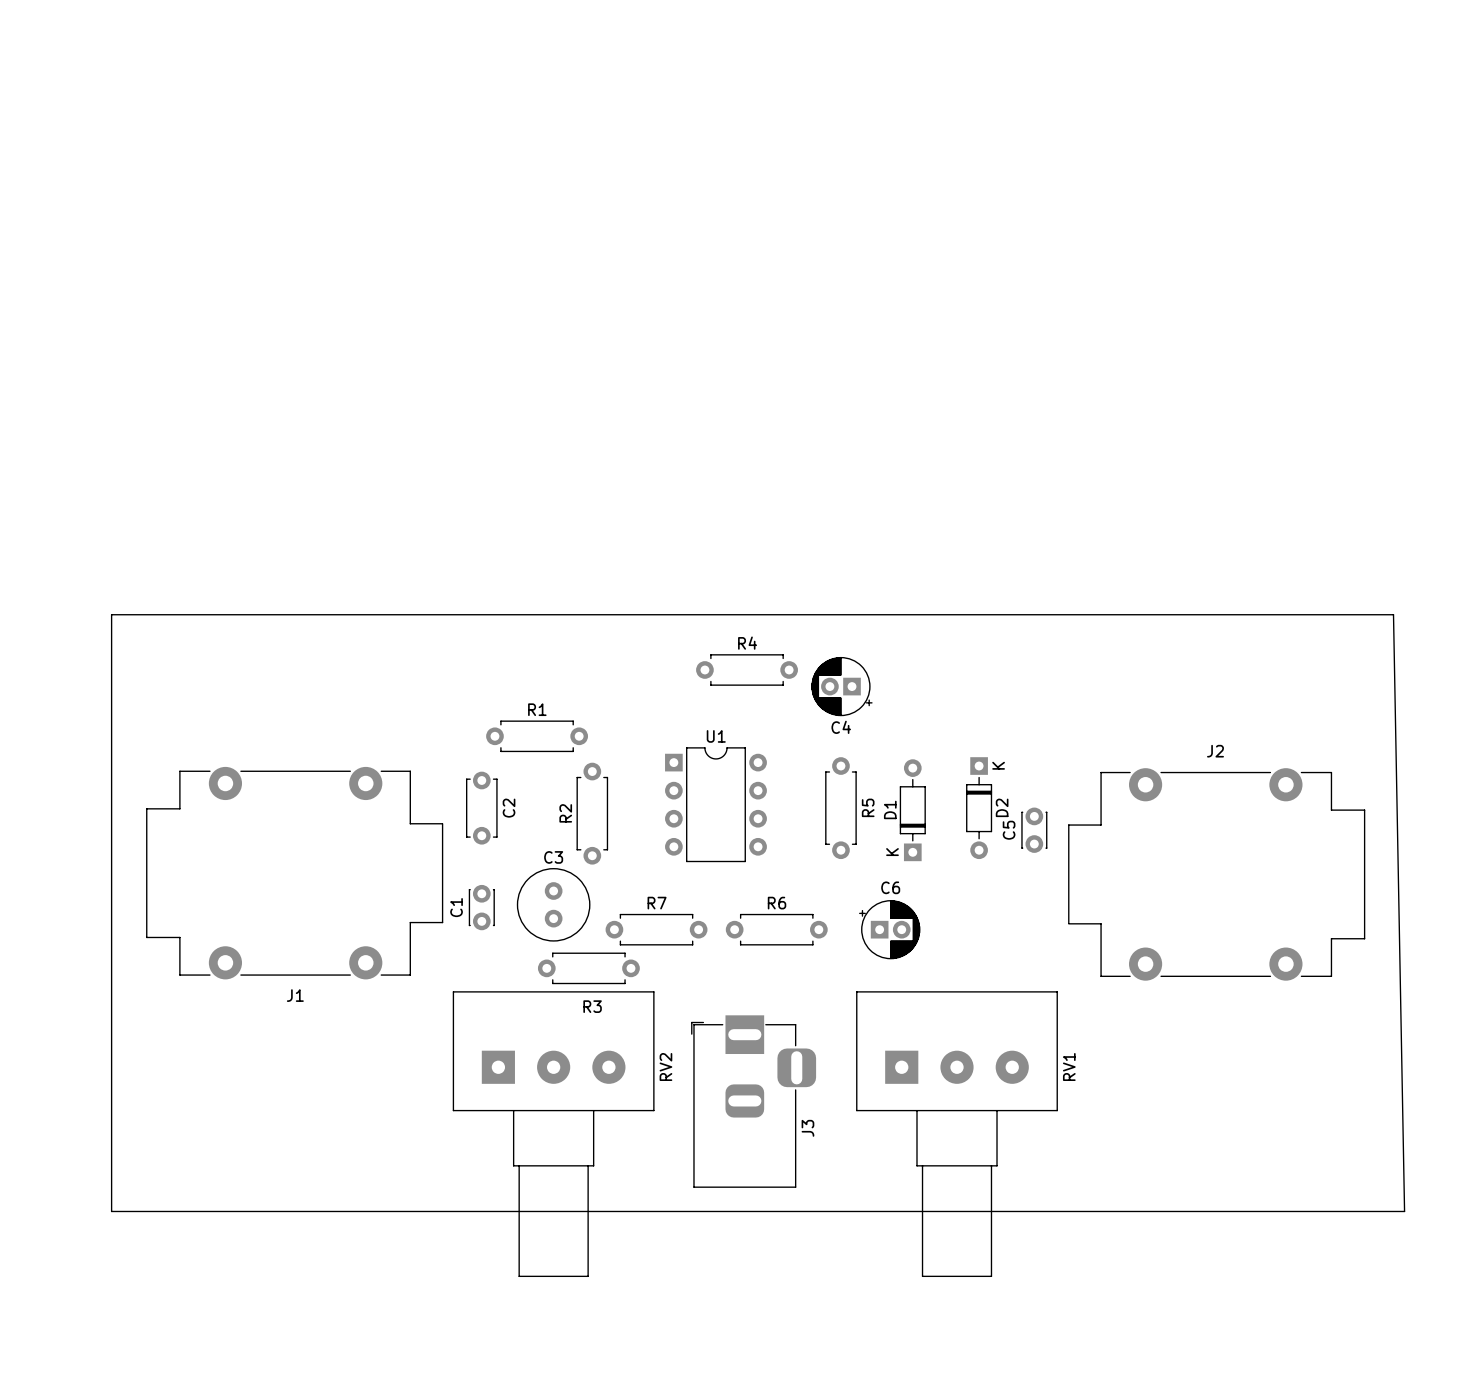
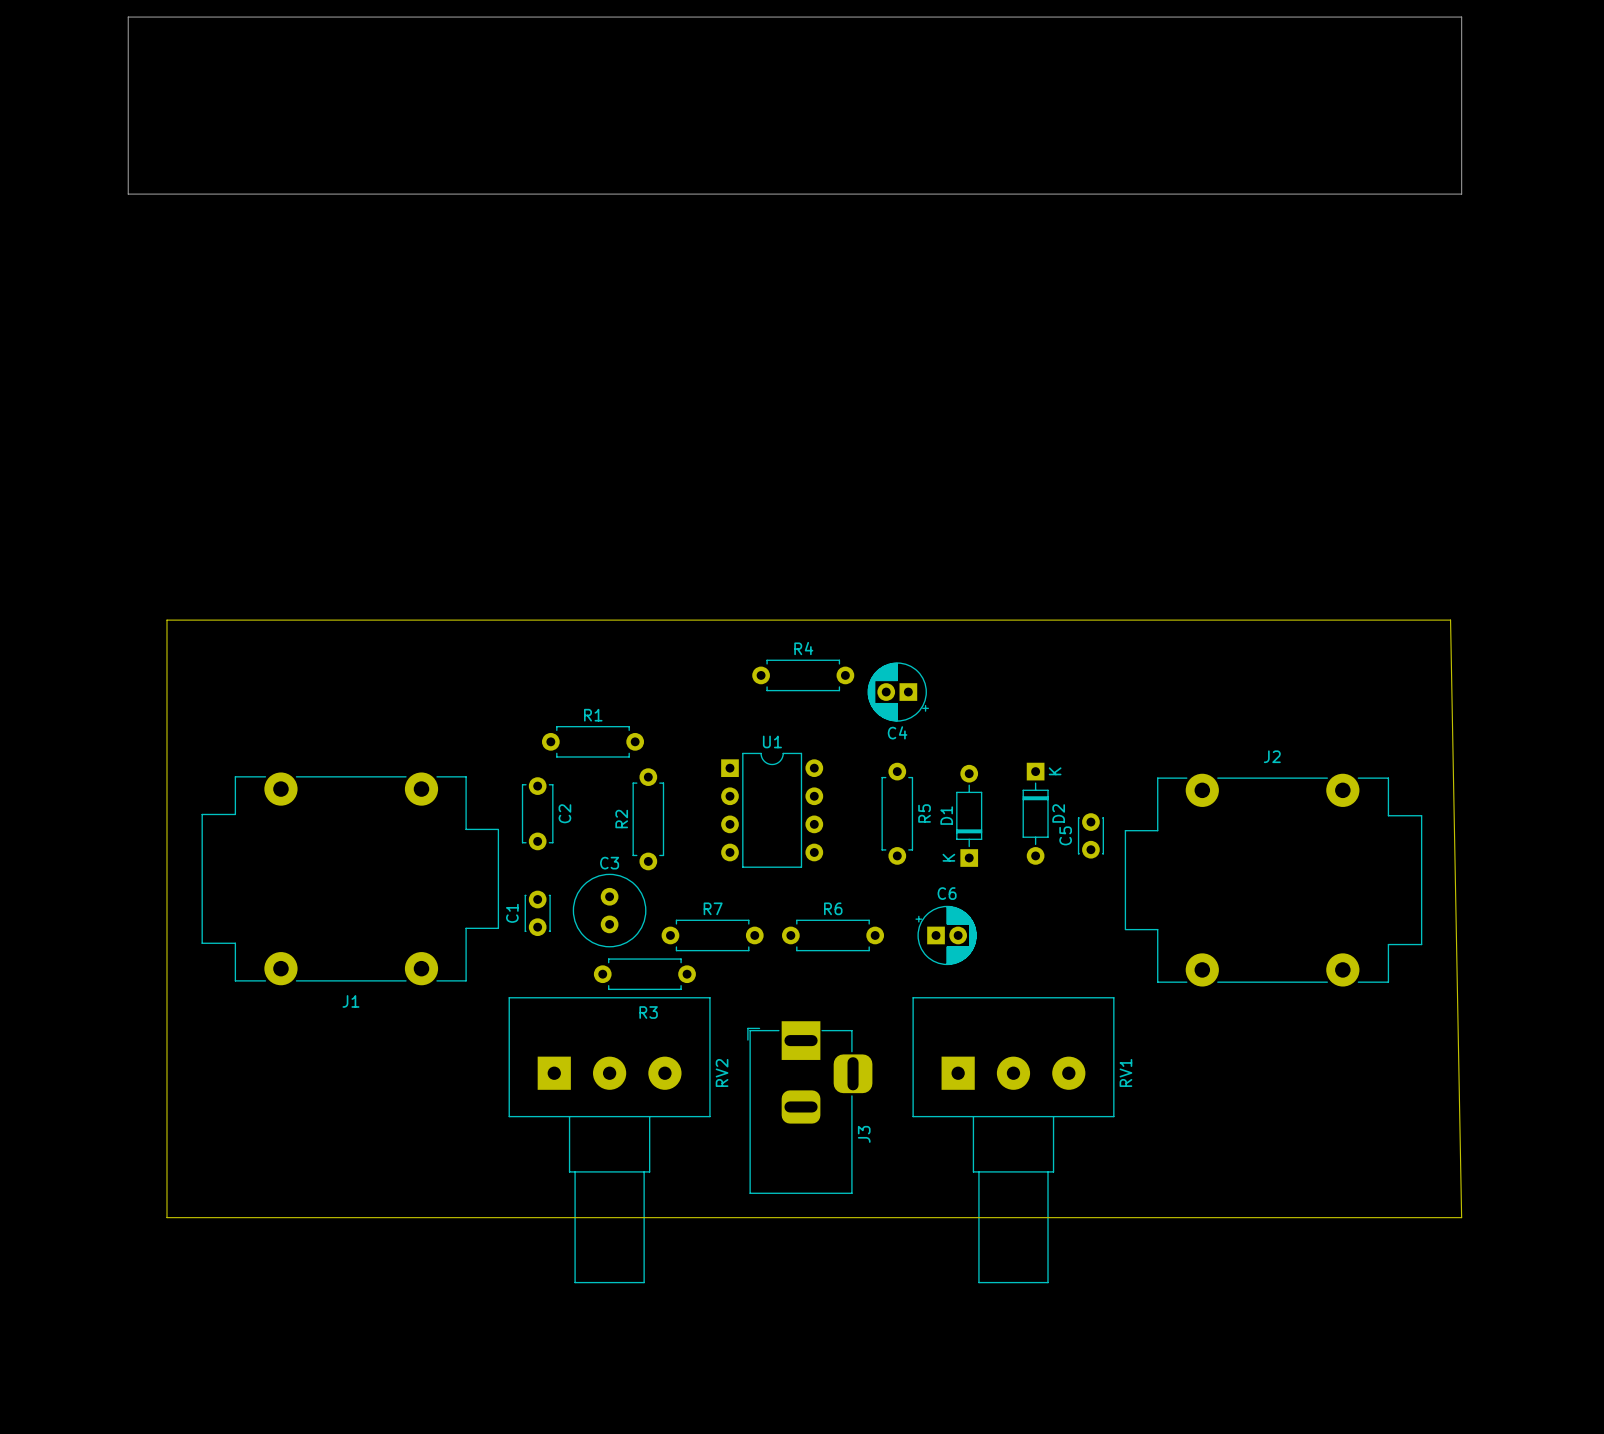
line: none -> (128, 17) (1461, 17) (1461, 194) (128, 194) (128, 17)

